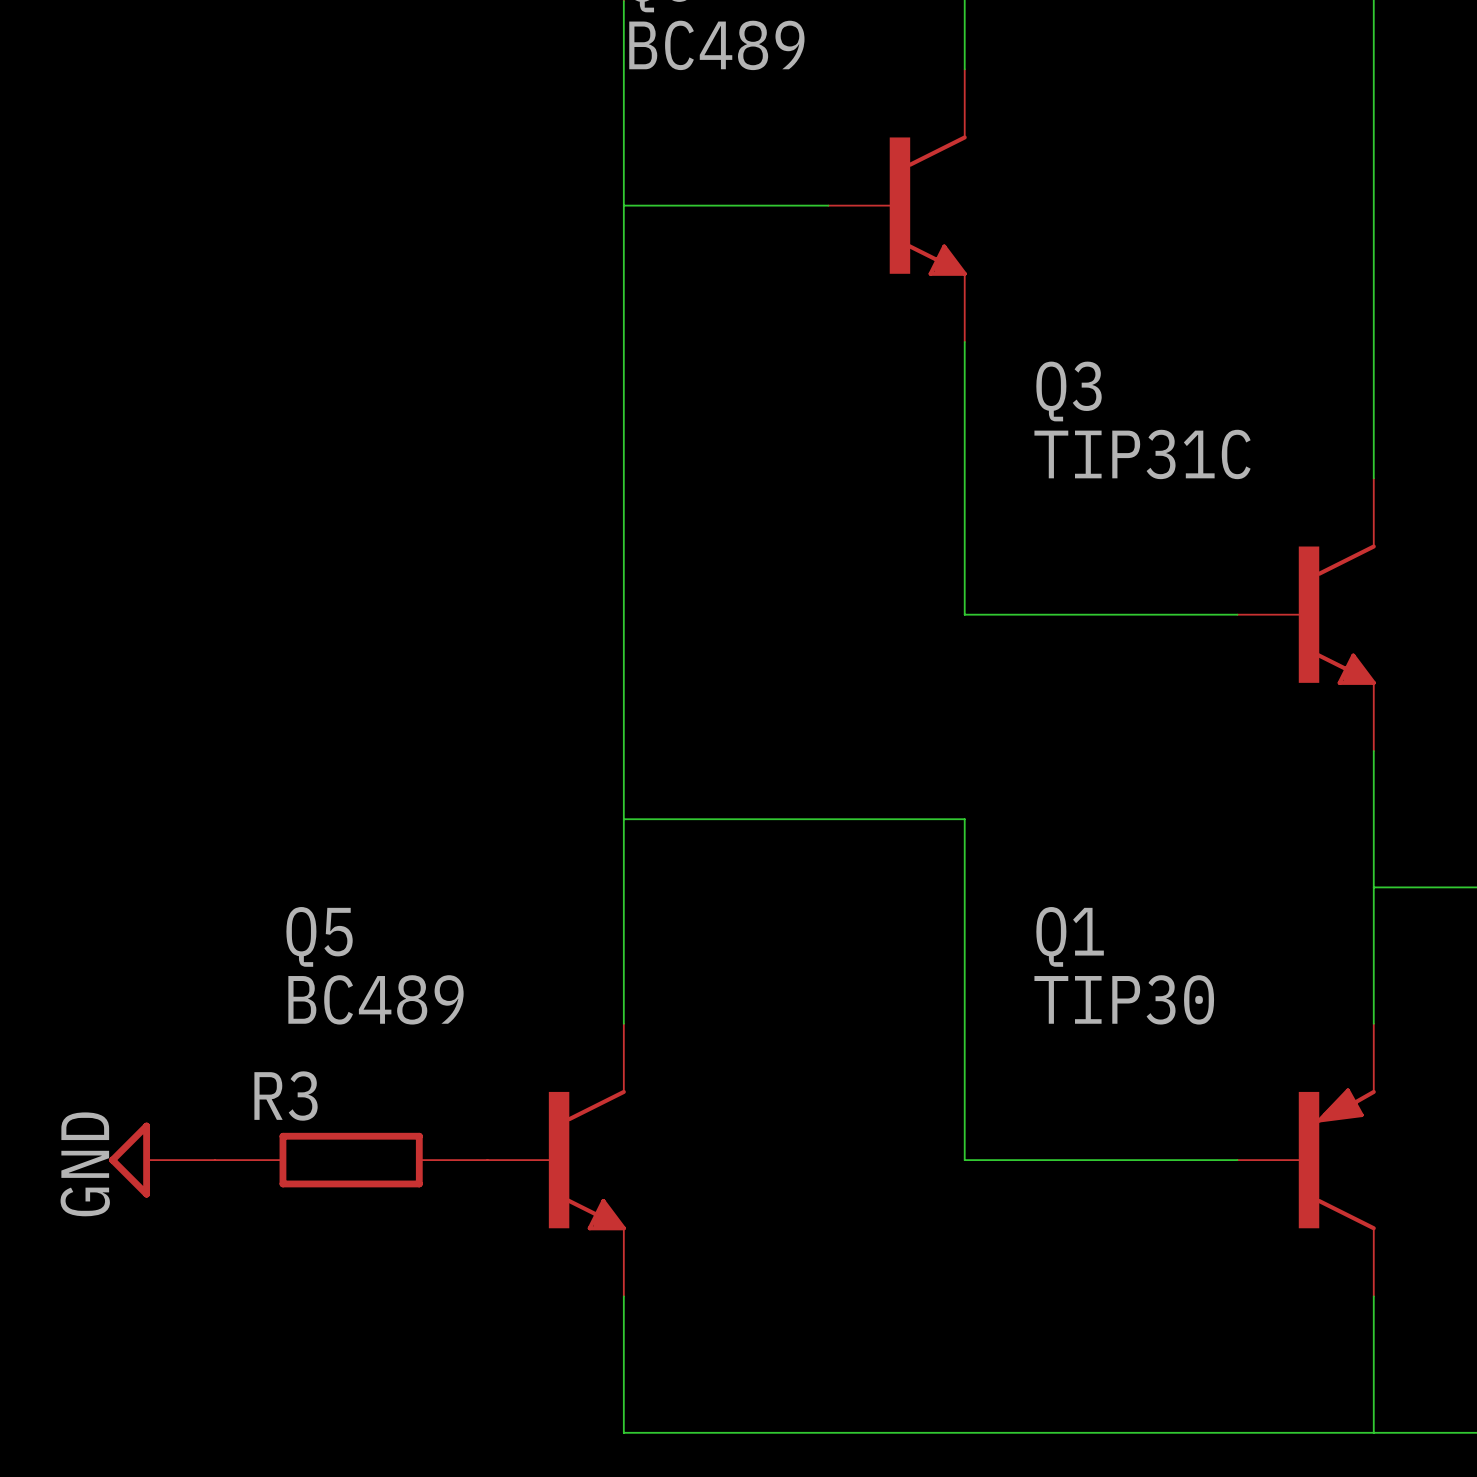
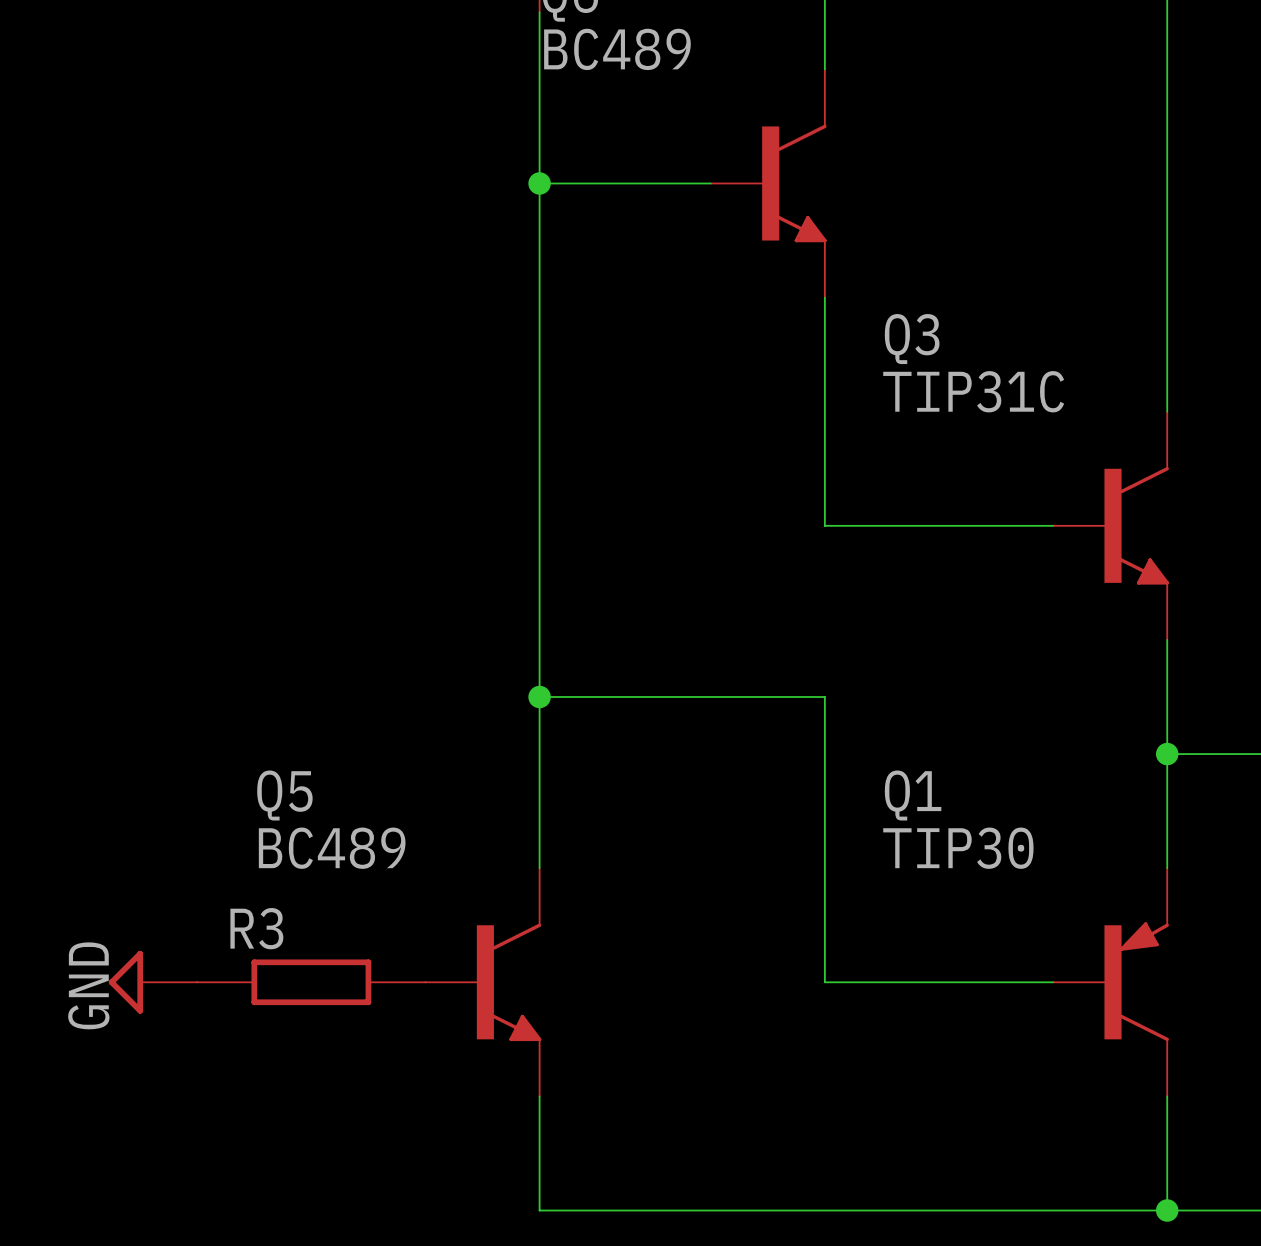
junction: none -> (539, 183)
junction: none -> (539, 697)
junction: none -> (1167, 754)
junction: none -> (1167, 1210)

